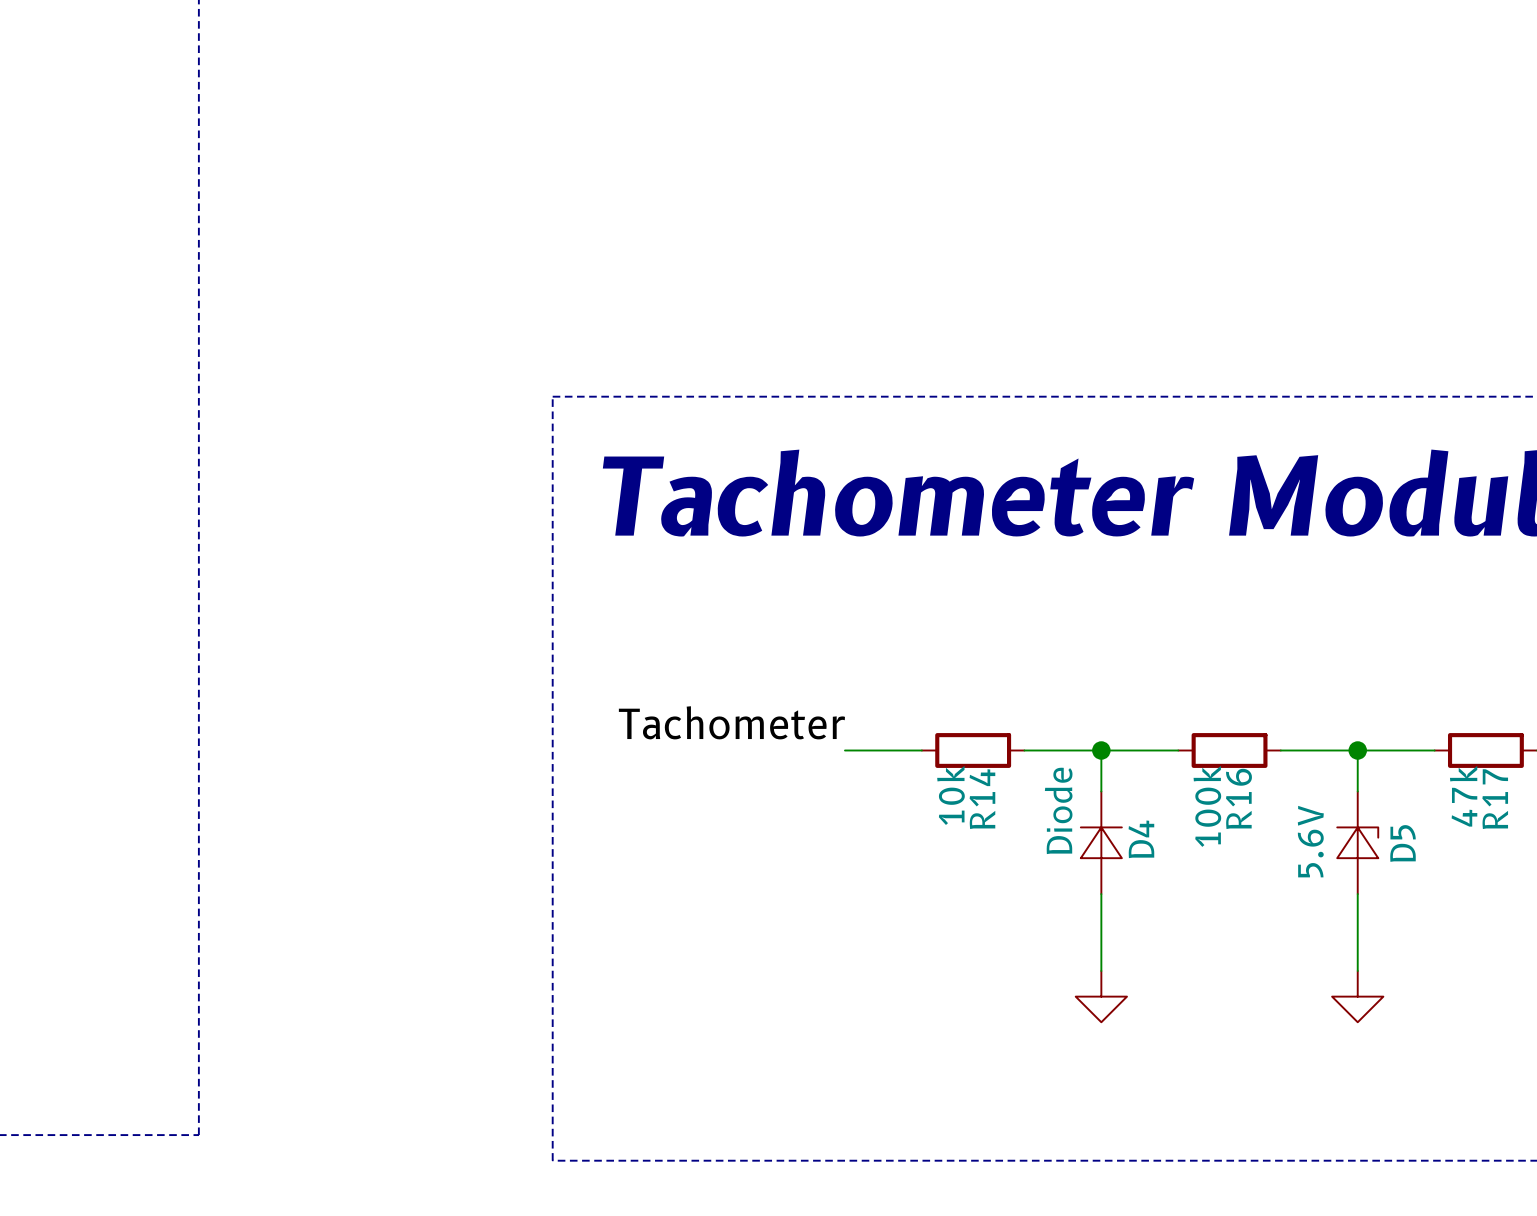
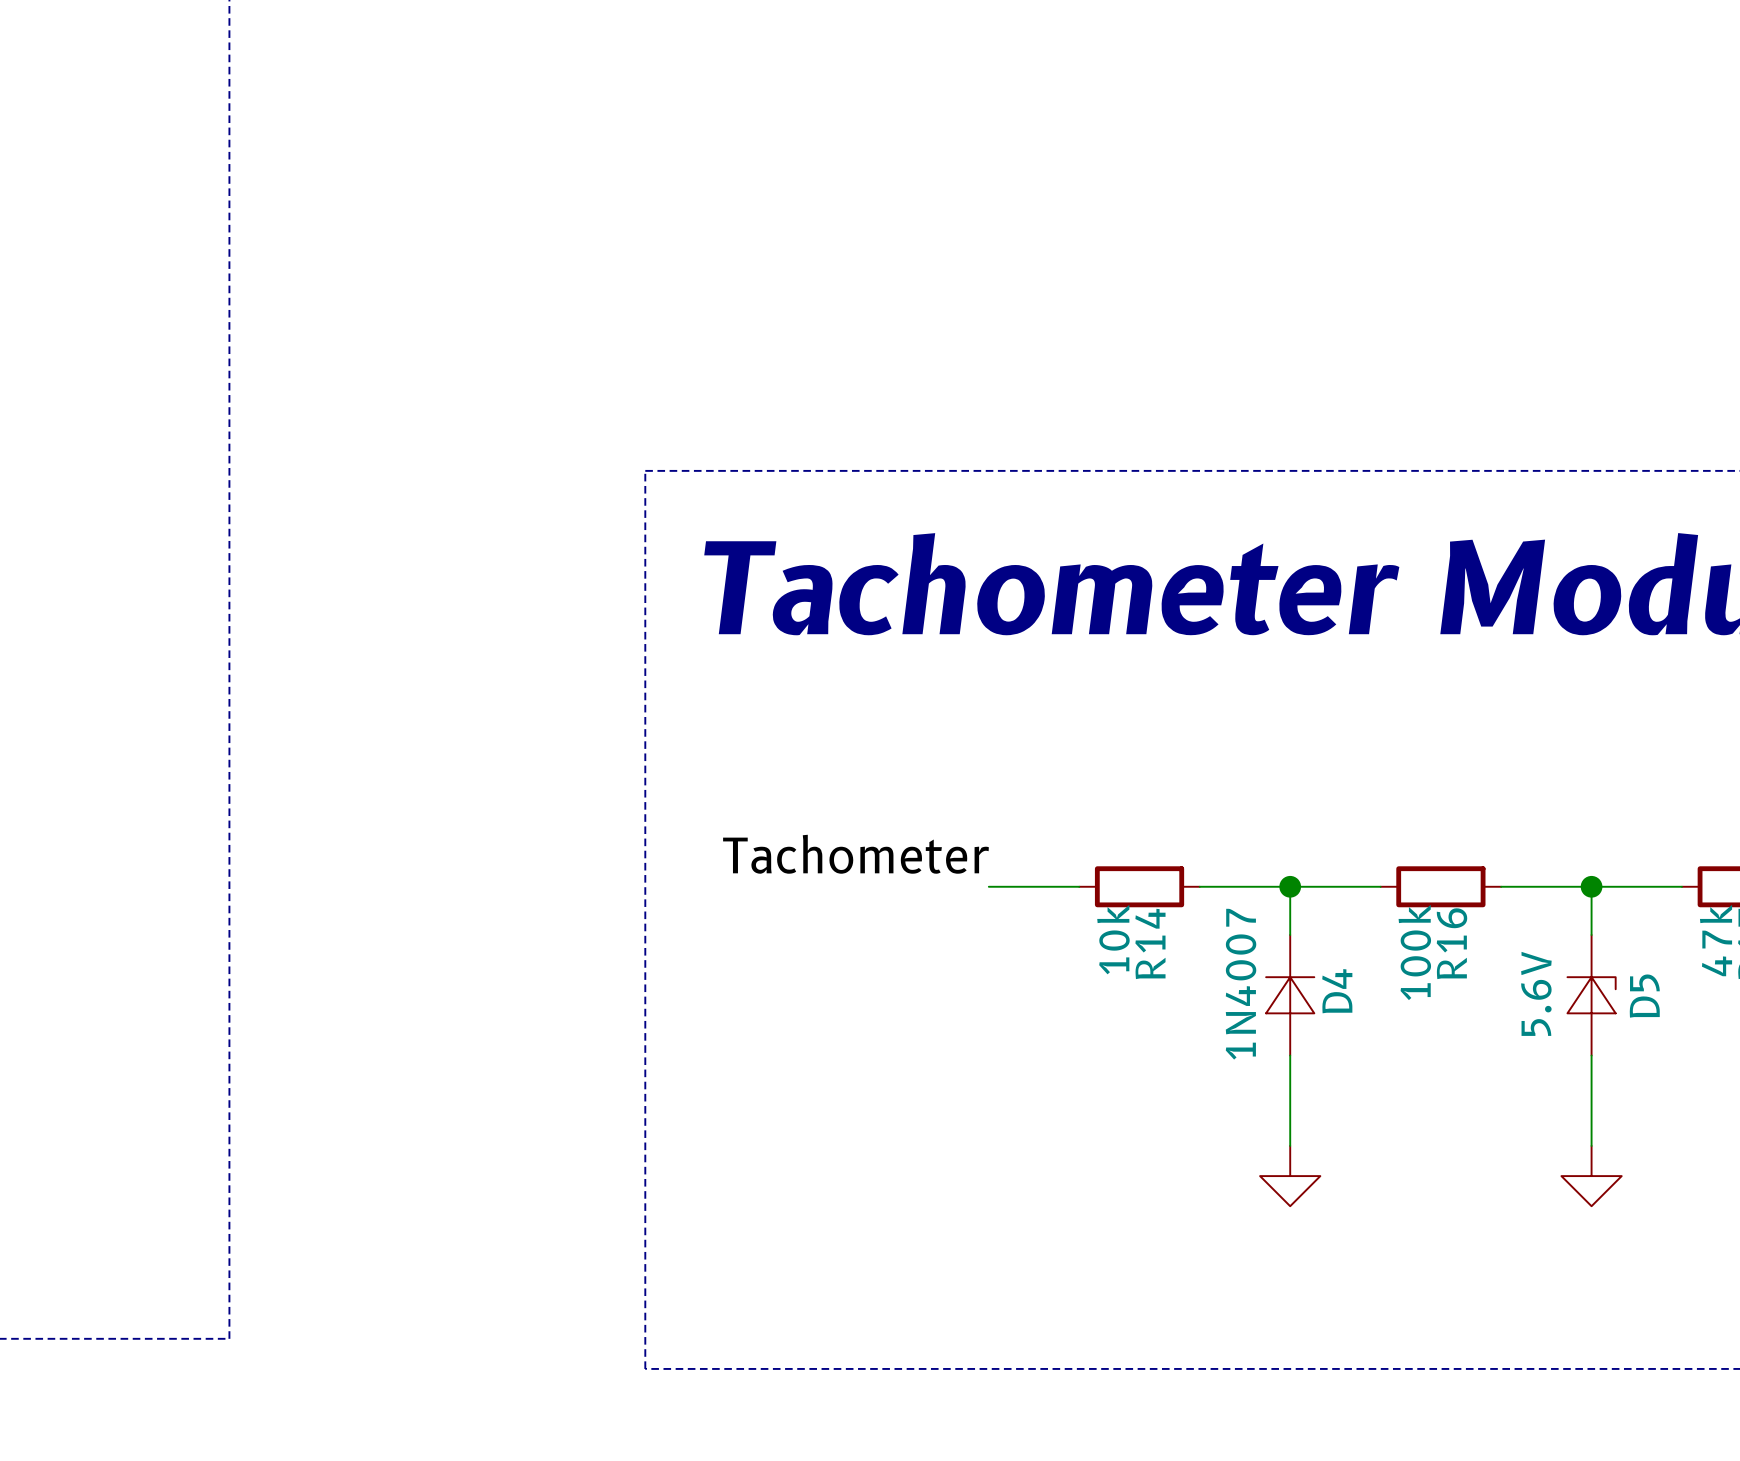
D4 value: Diode (1058, 810) -> 1N4007 (1241, 984)

